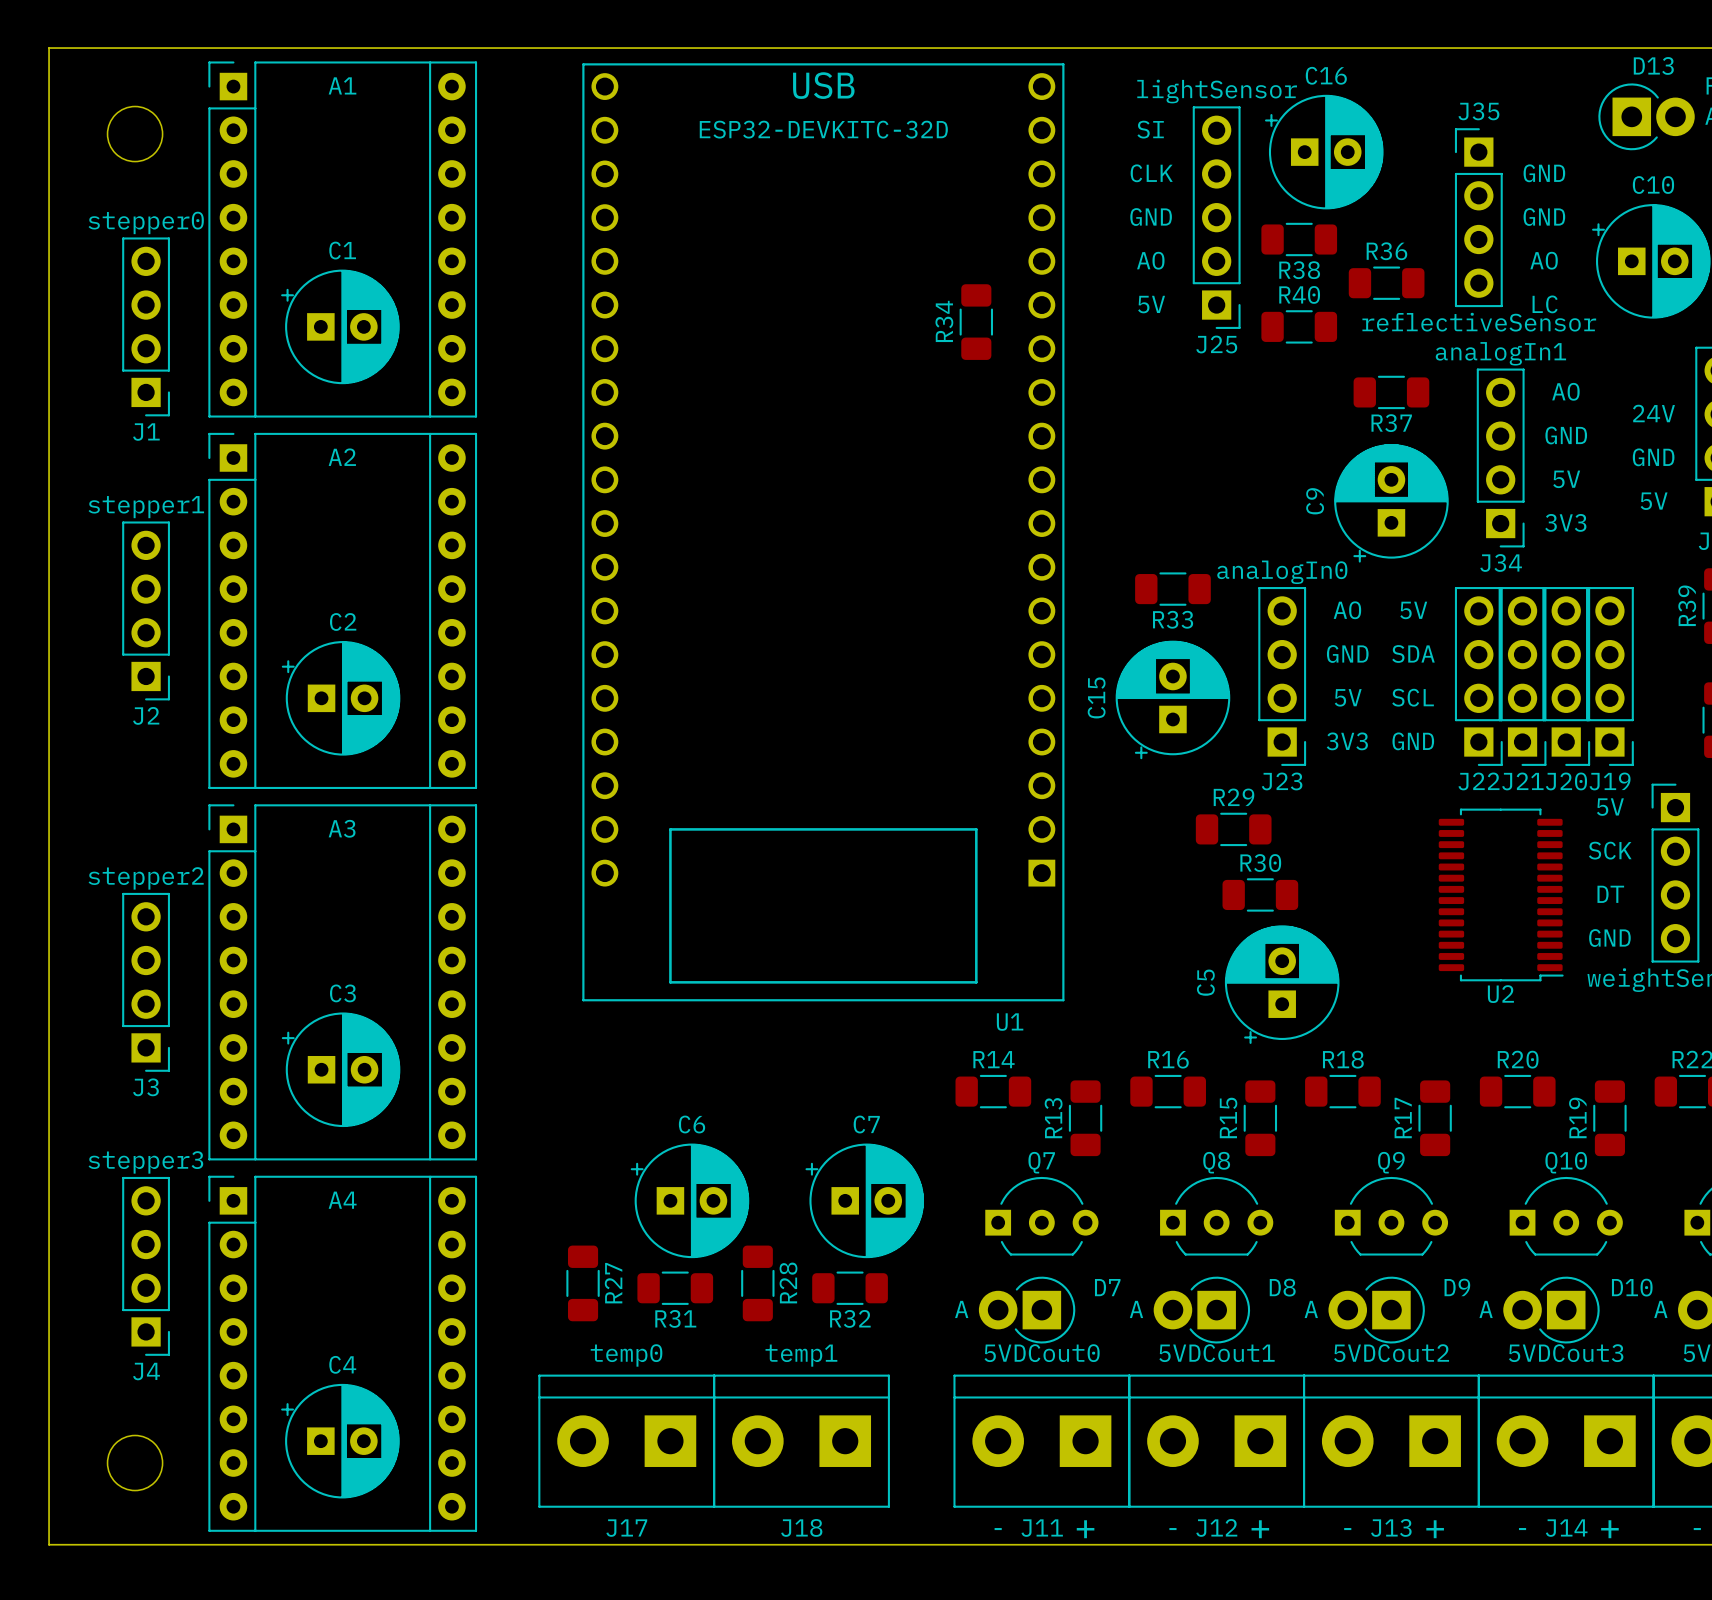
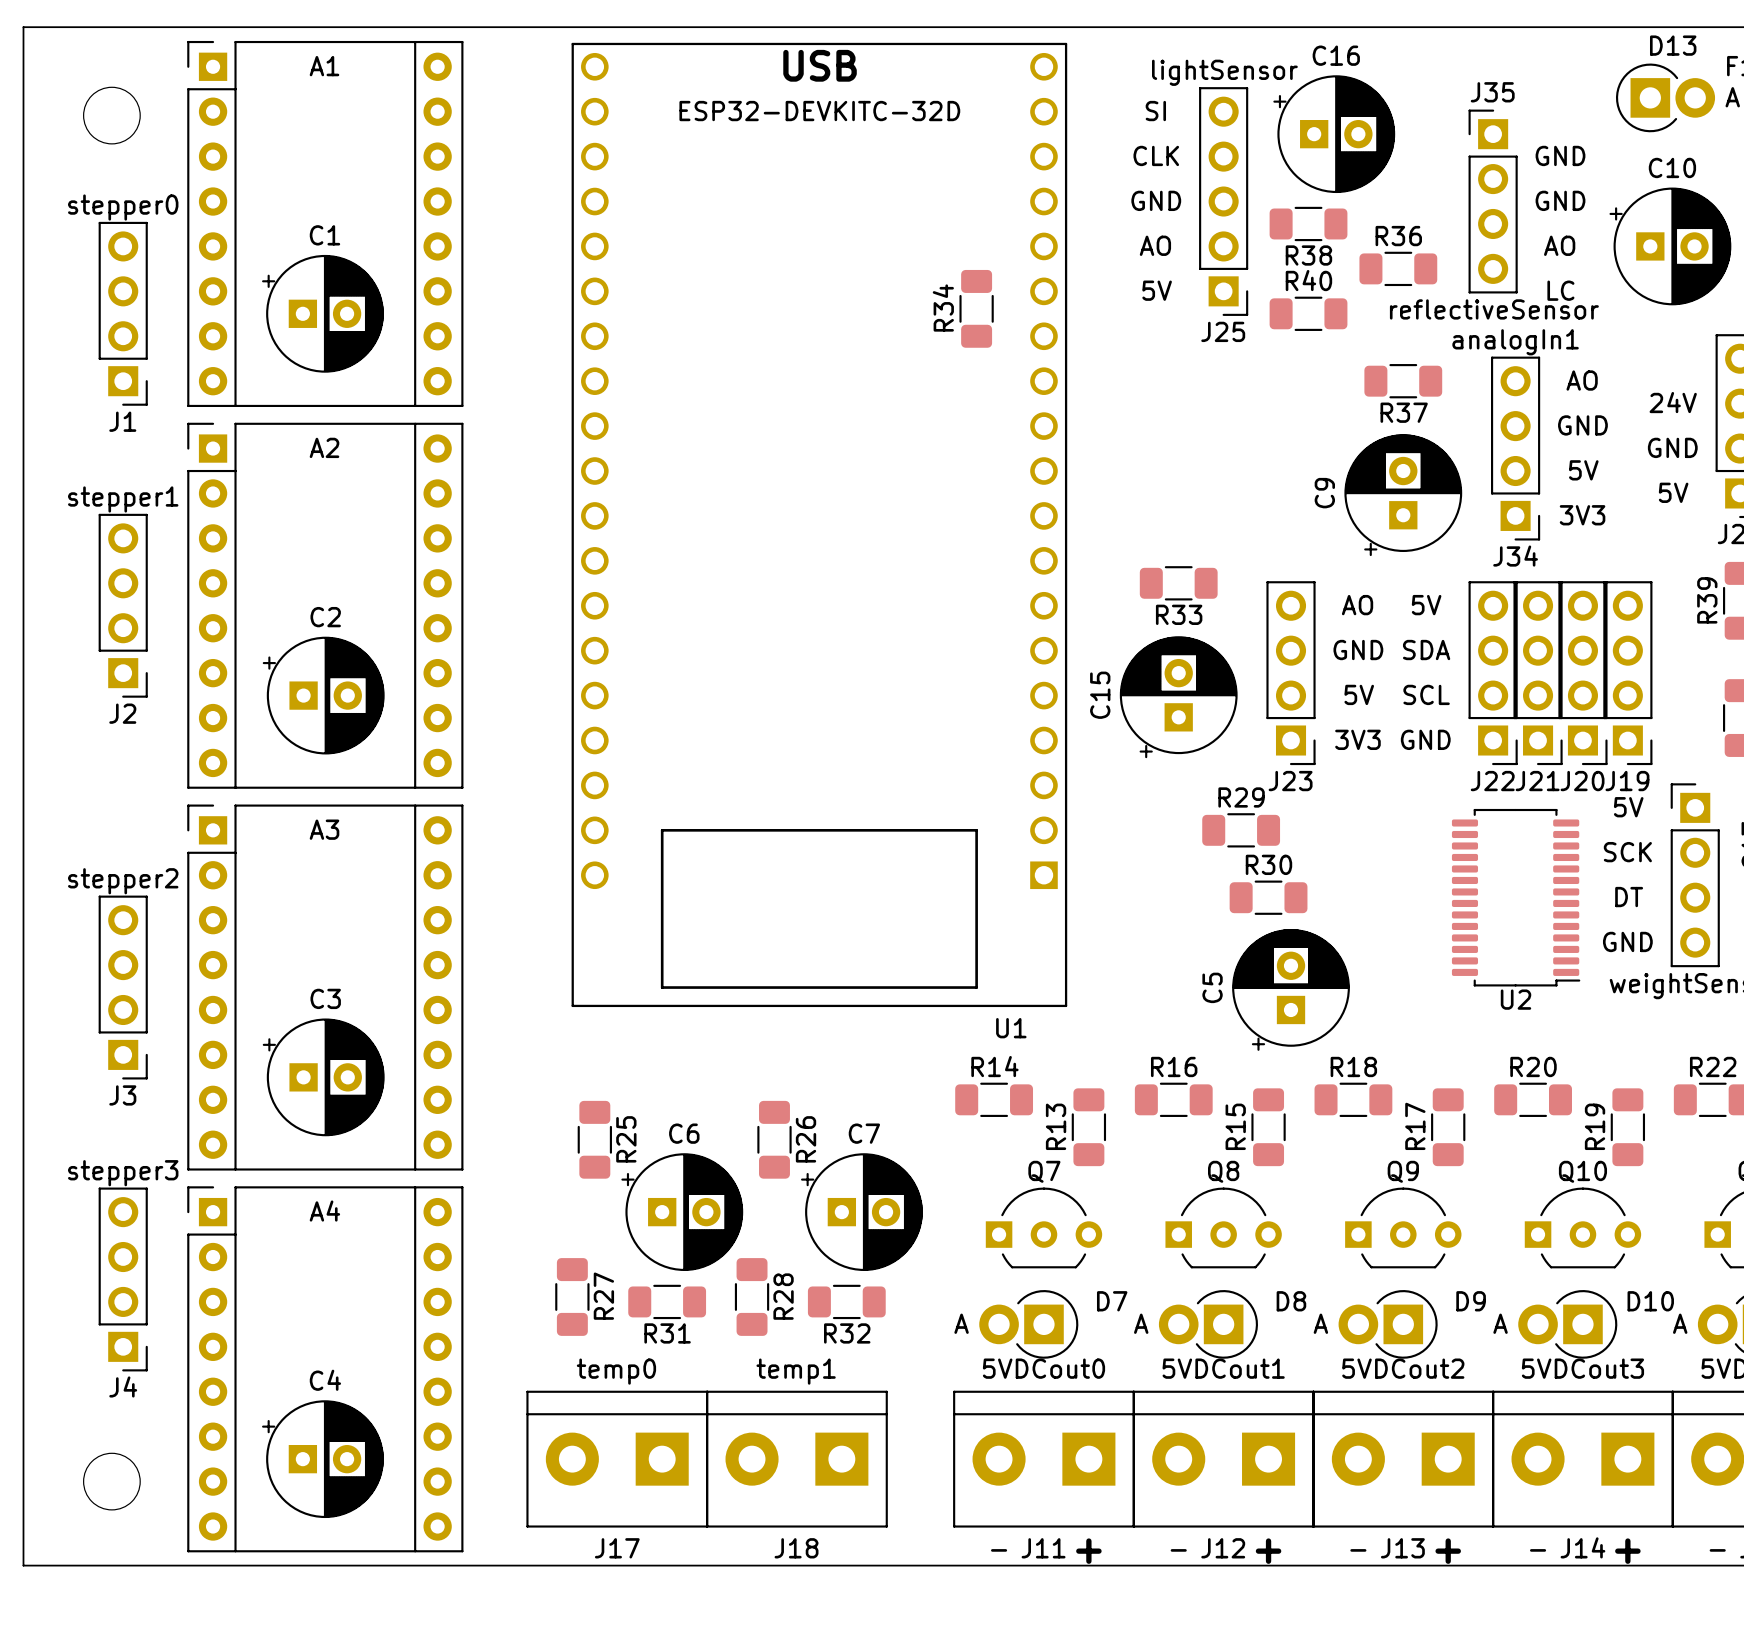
J23 value: analogIn0 (1282, 572) -> none
R25: none -> (594, 1139)
R26: none -> (774, 1139)

